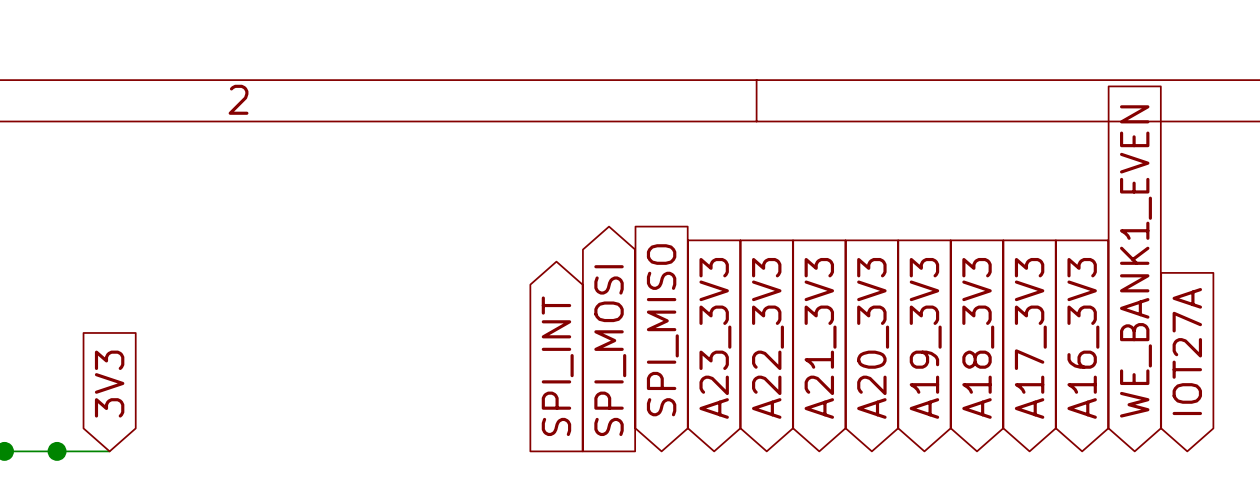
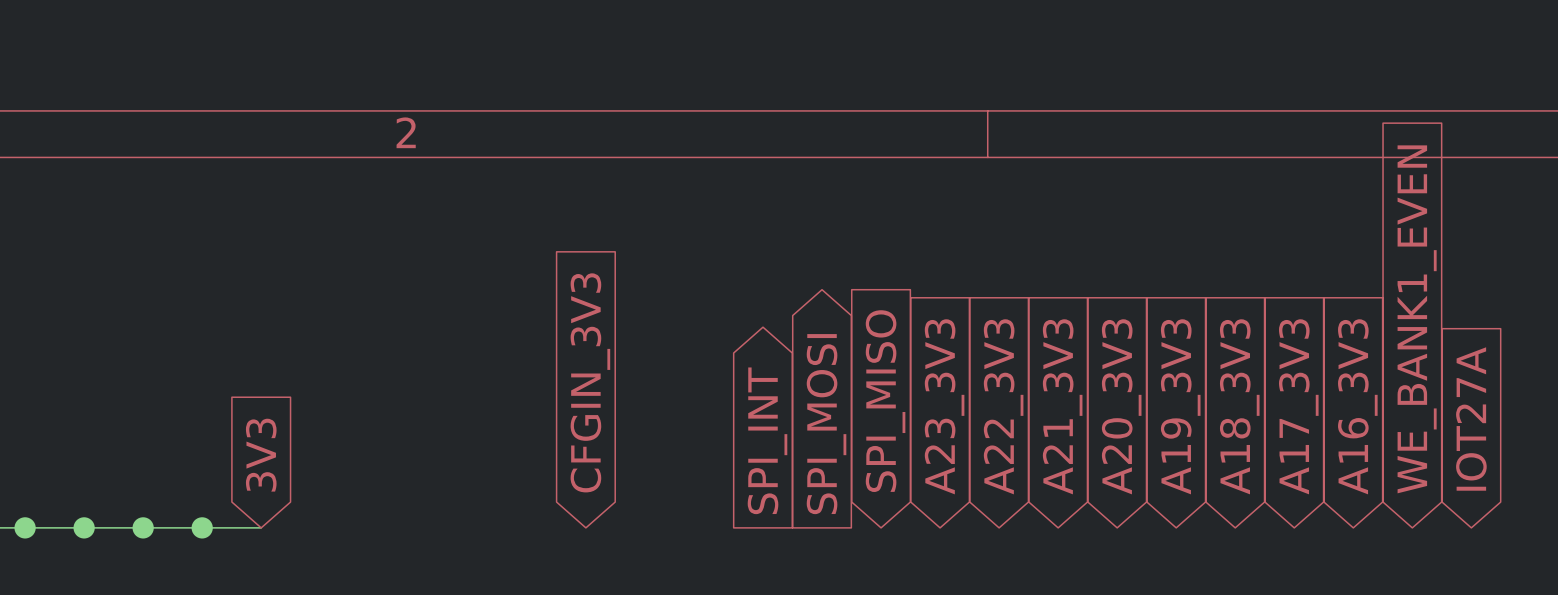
global label: none -> CFGIN_3V3 (590, 382)

